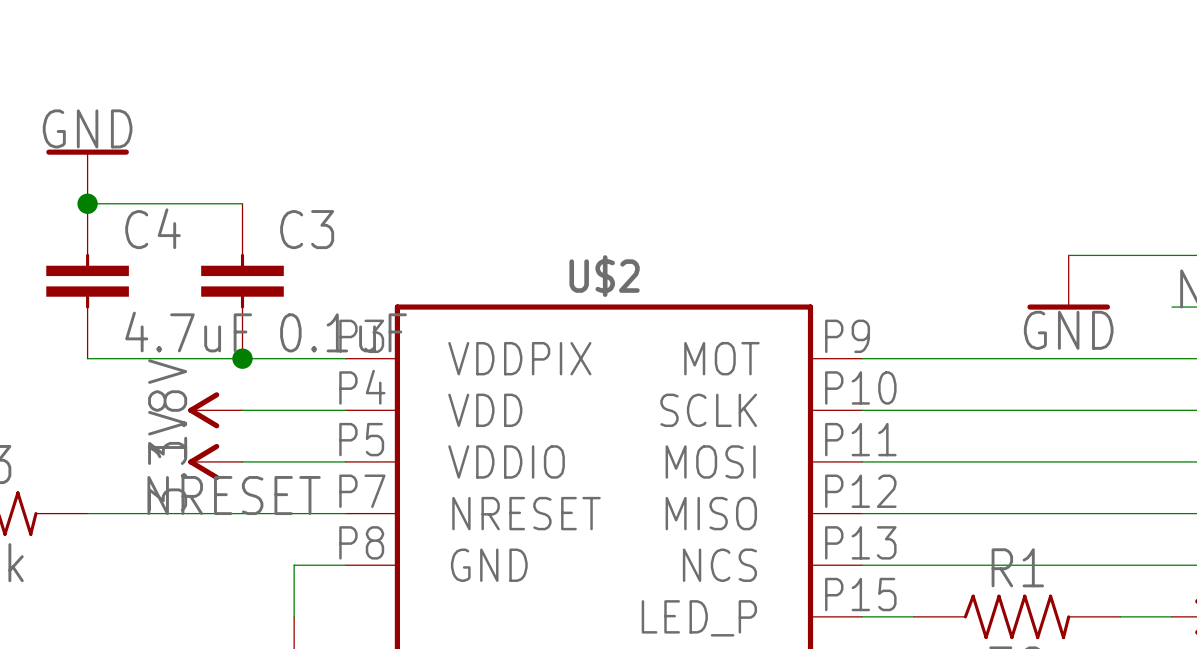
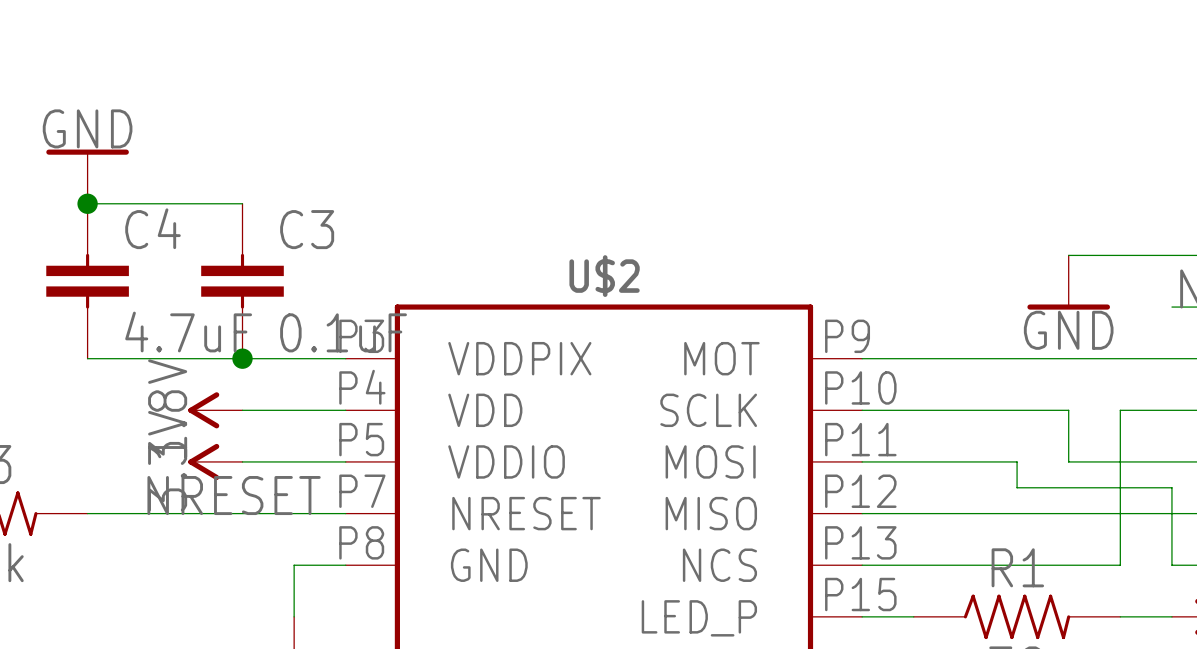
wire: (1068, 410) (1120, 410) -> (1068, 410) (1068, 461)
wire: (1017, 461) (1068, 461) -> (1017, 461) (1017, 487) (1171, 487) (1171, 565)
wire: (1120, 565) (1171, 565) -> (1120, 565) (1120, 410)

